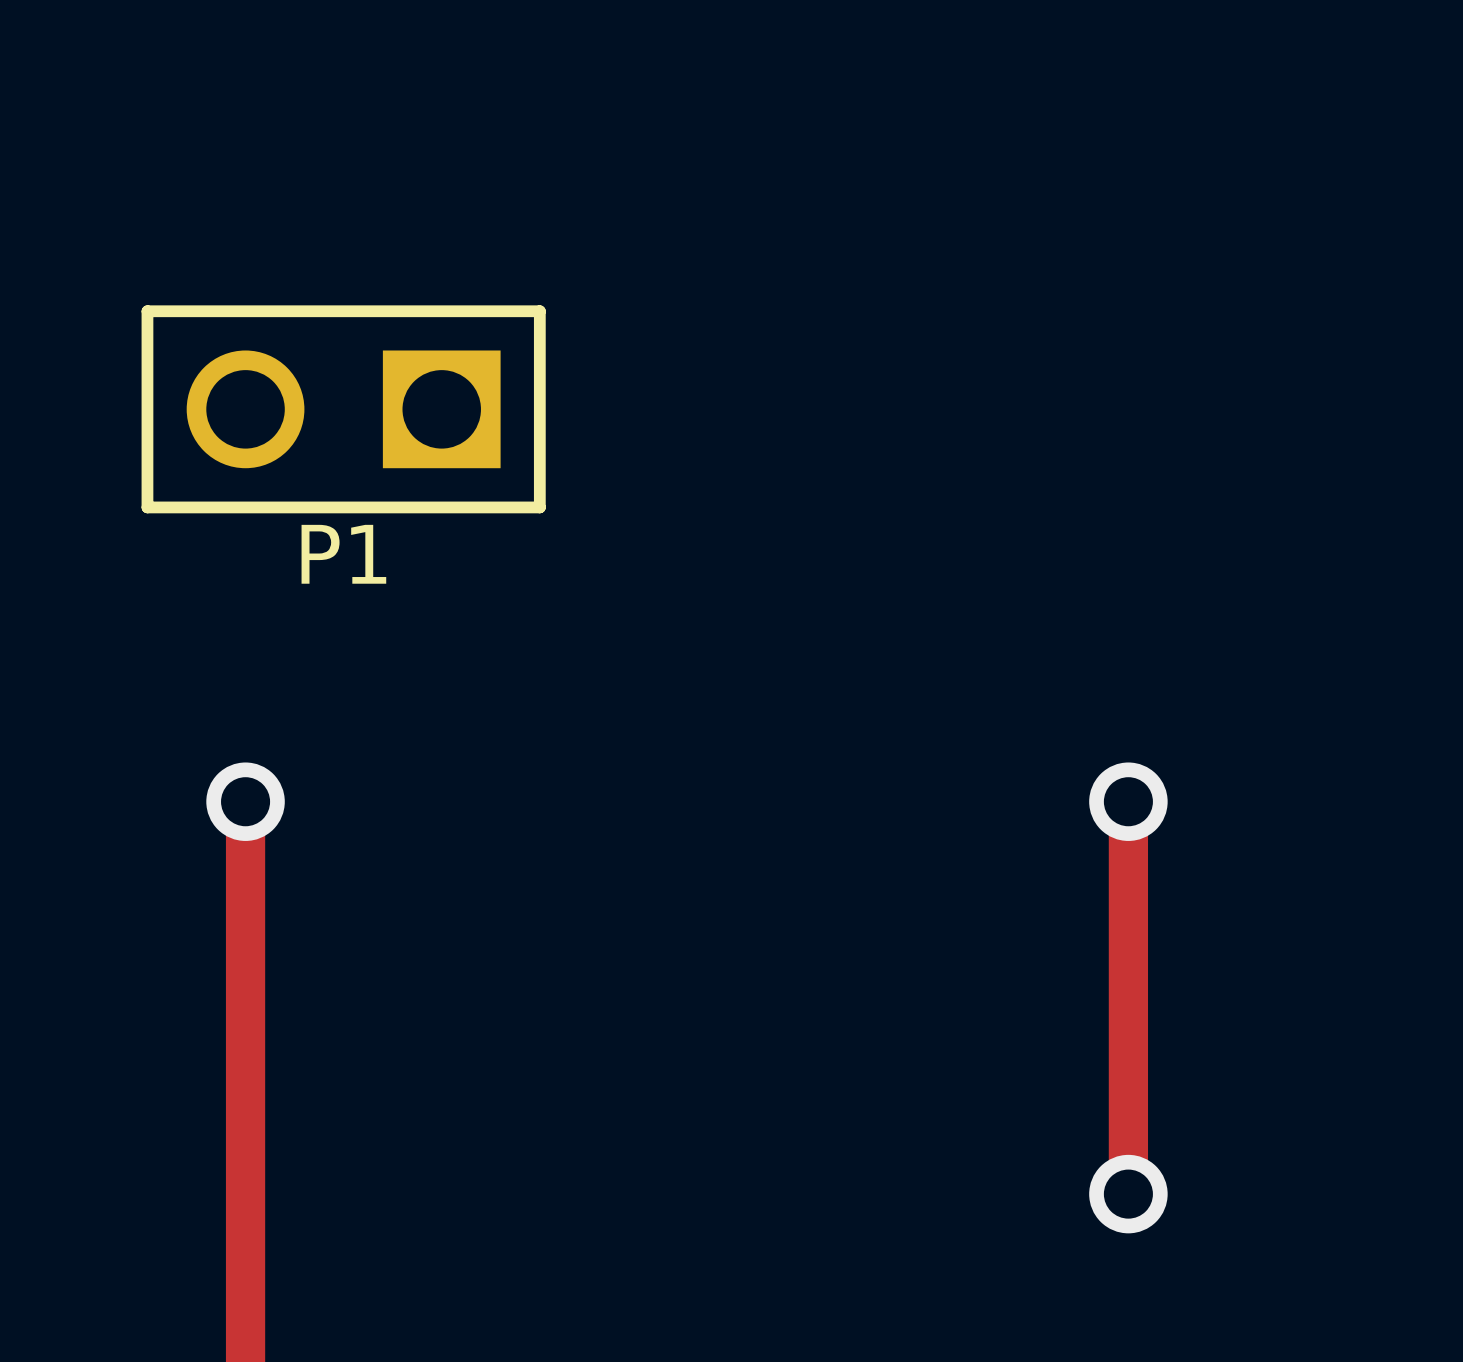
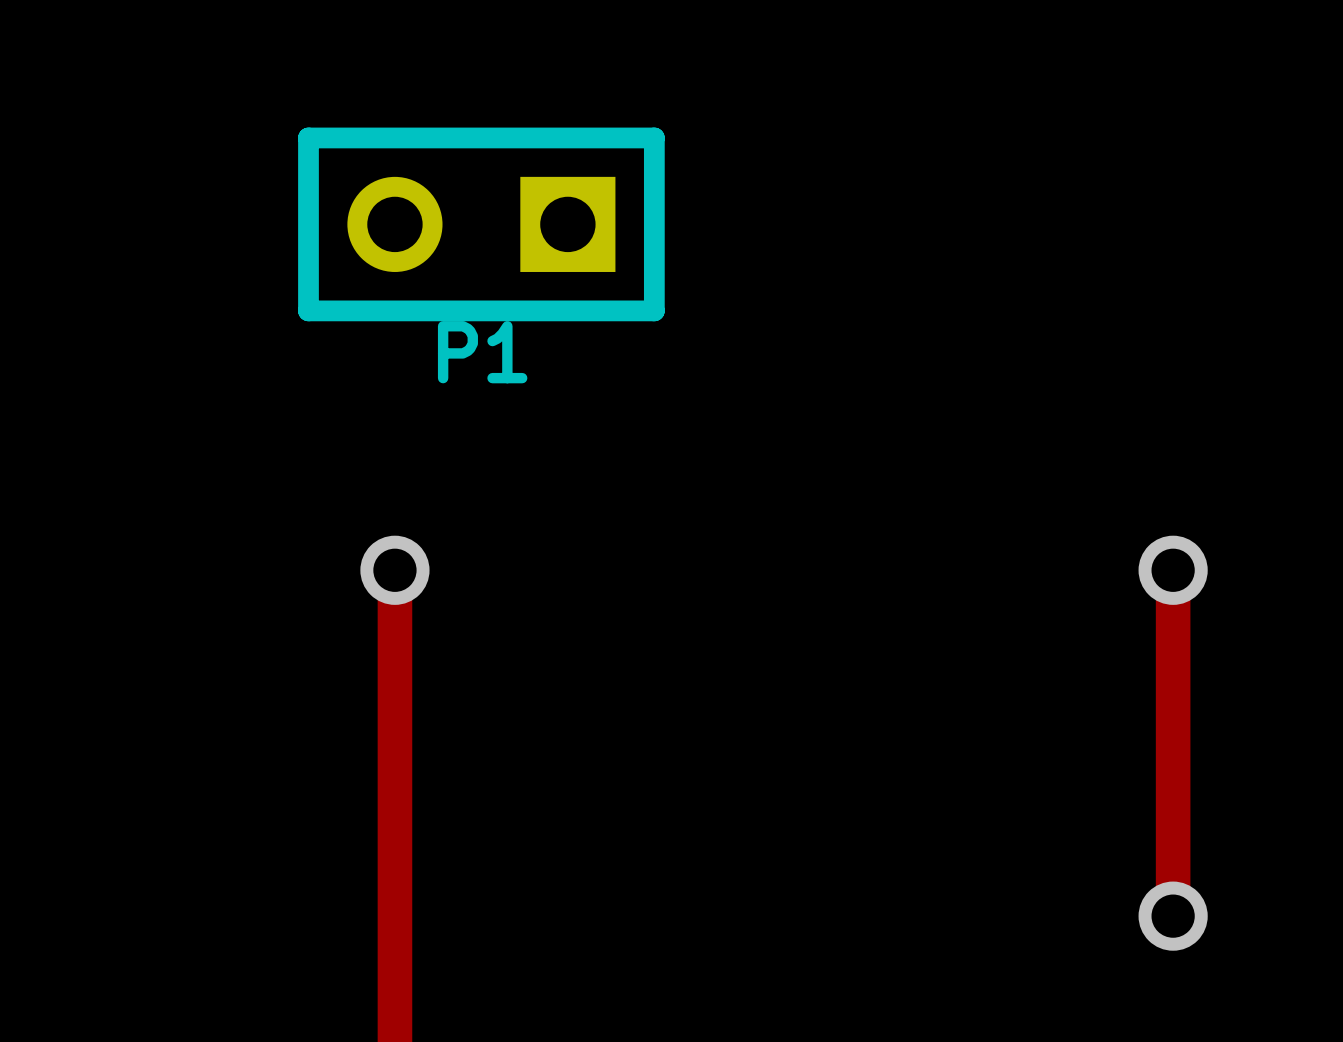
P1 footprint: [141, 305, 546, 514] -> [298, 127, 665, 322]

